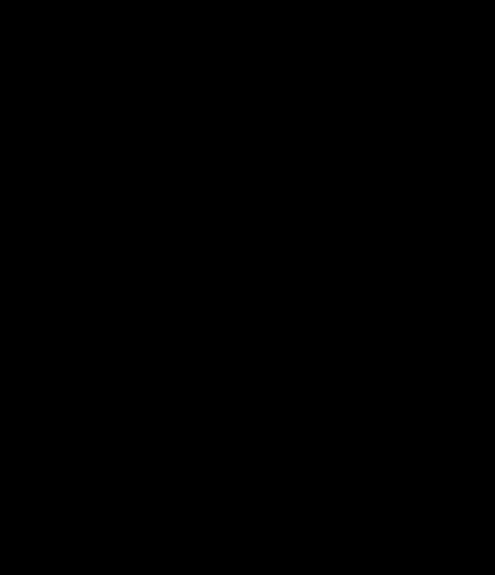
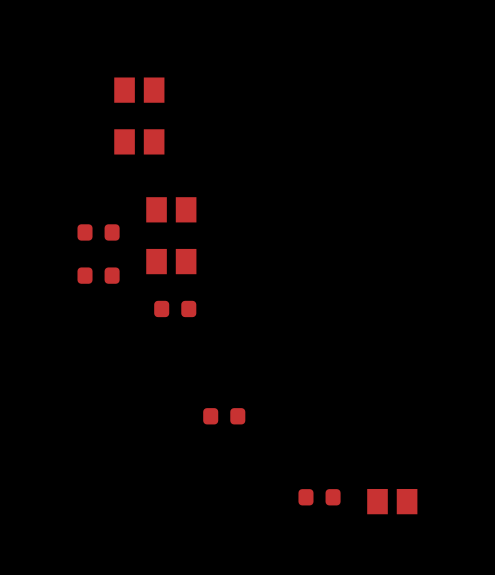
part: none -> (139, 90)
part: none -> (139, 141)
part: none -> (171, 209)
part: none -> (98, 232)
part: none -> (171, 261)
part: none -> (98, 275)
part: none -> (175, 308)
part: none -> (224, 416)
part: none -> (319, 497)
part: none -> (392, 501)

